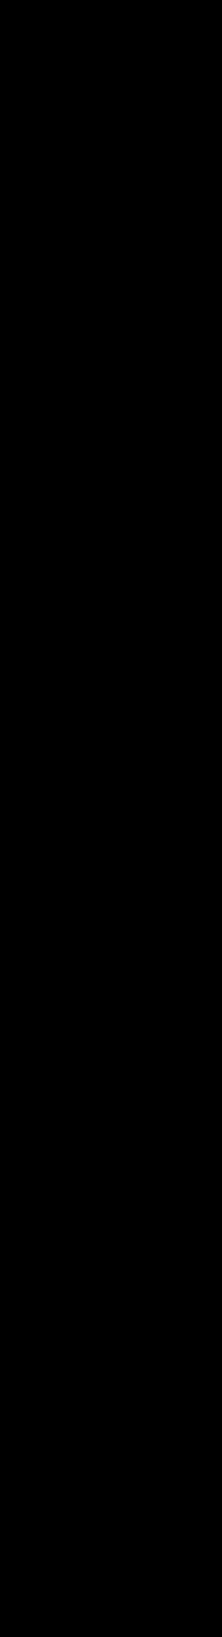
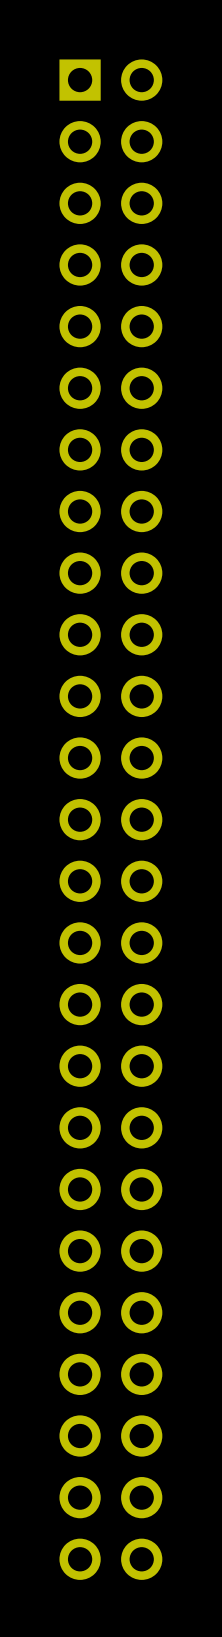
part: none -> (110, 819)

